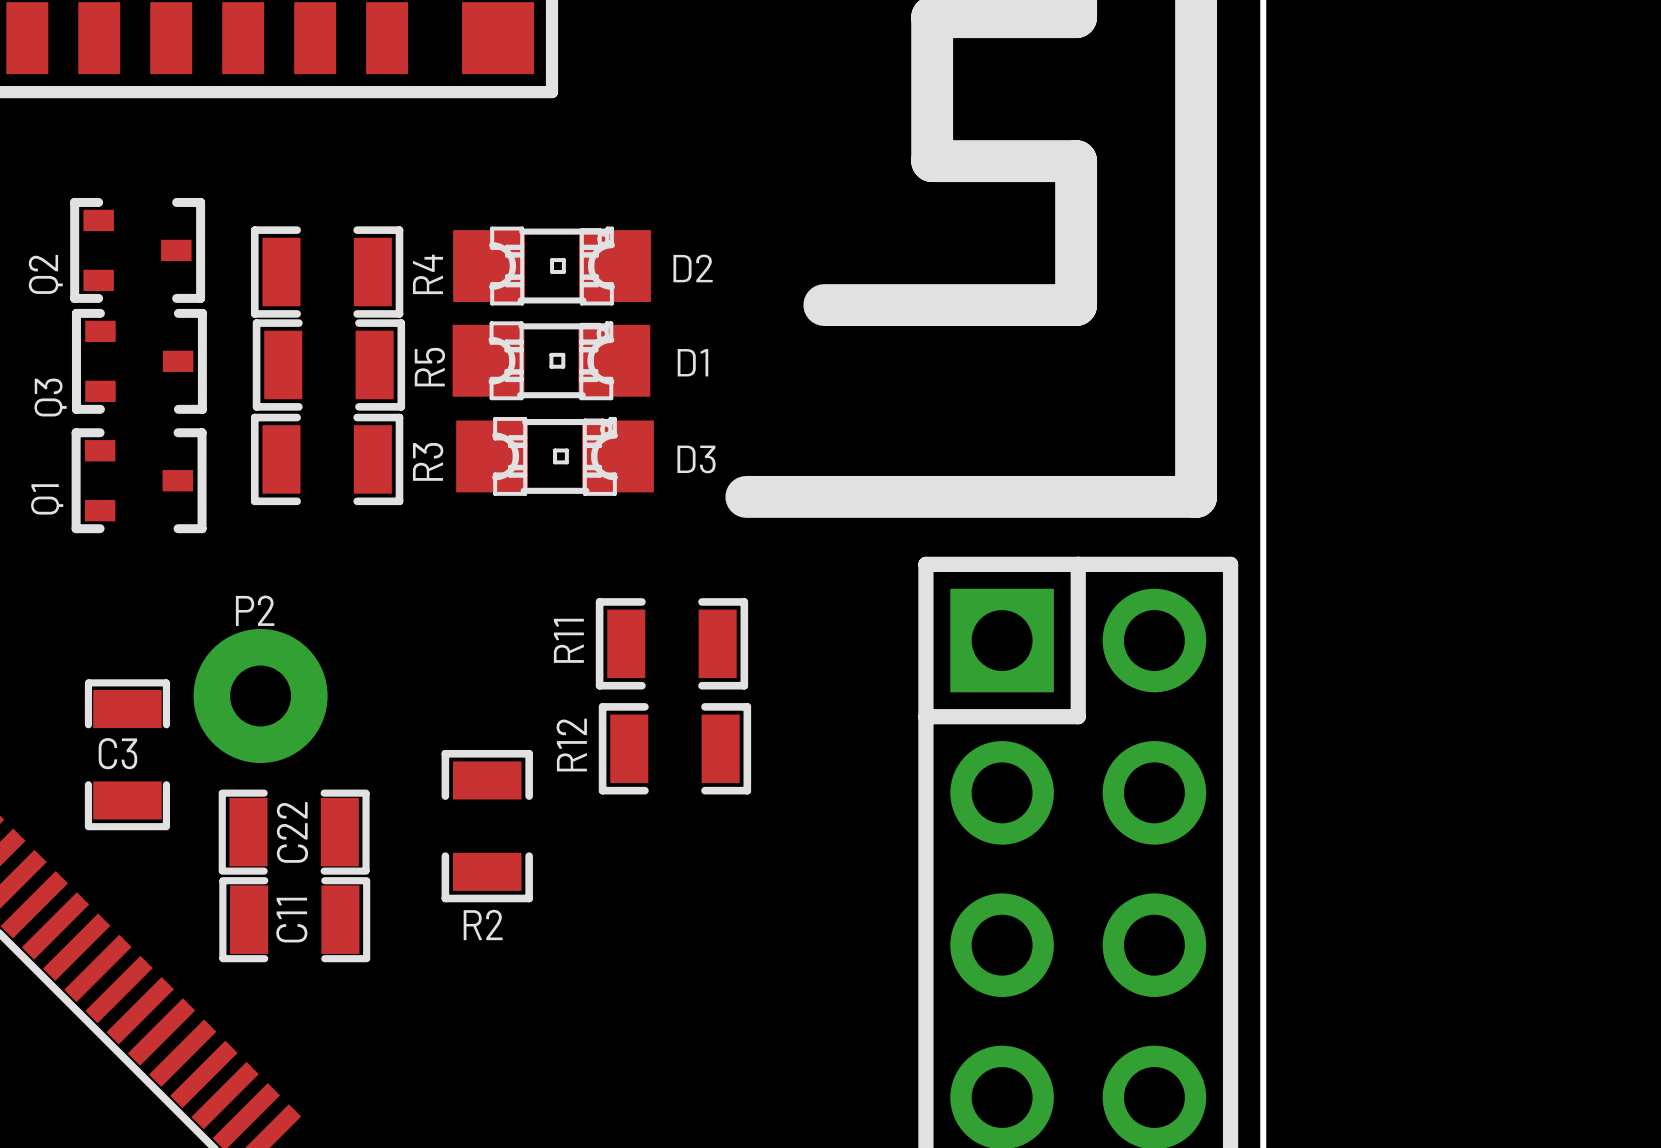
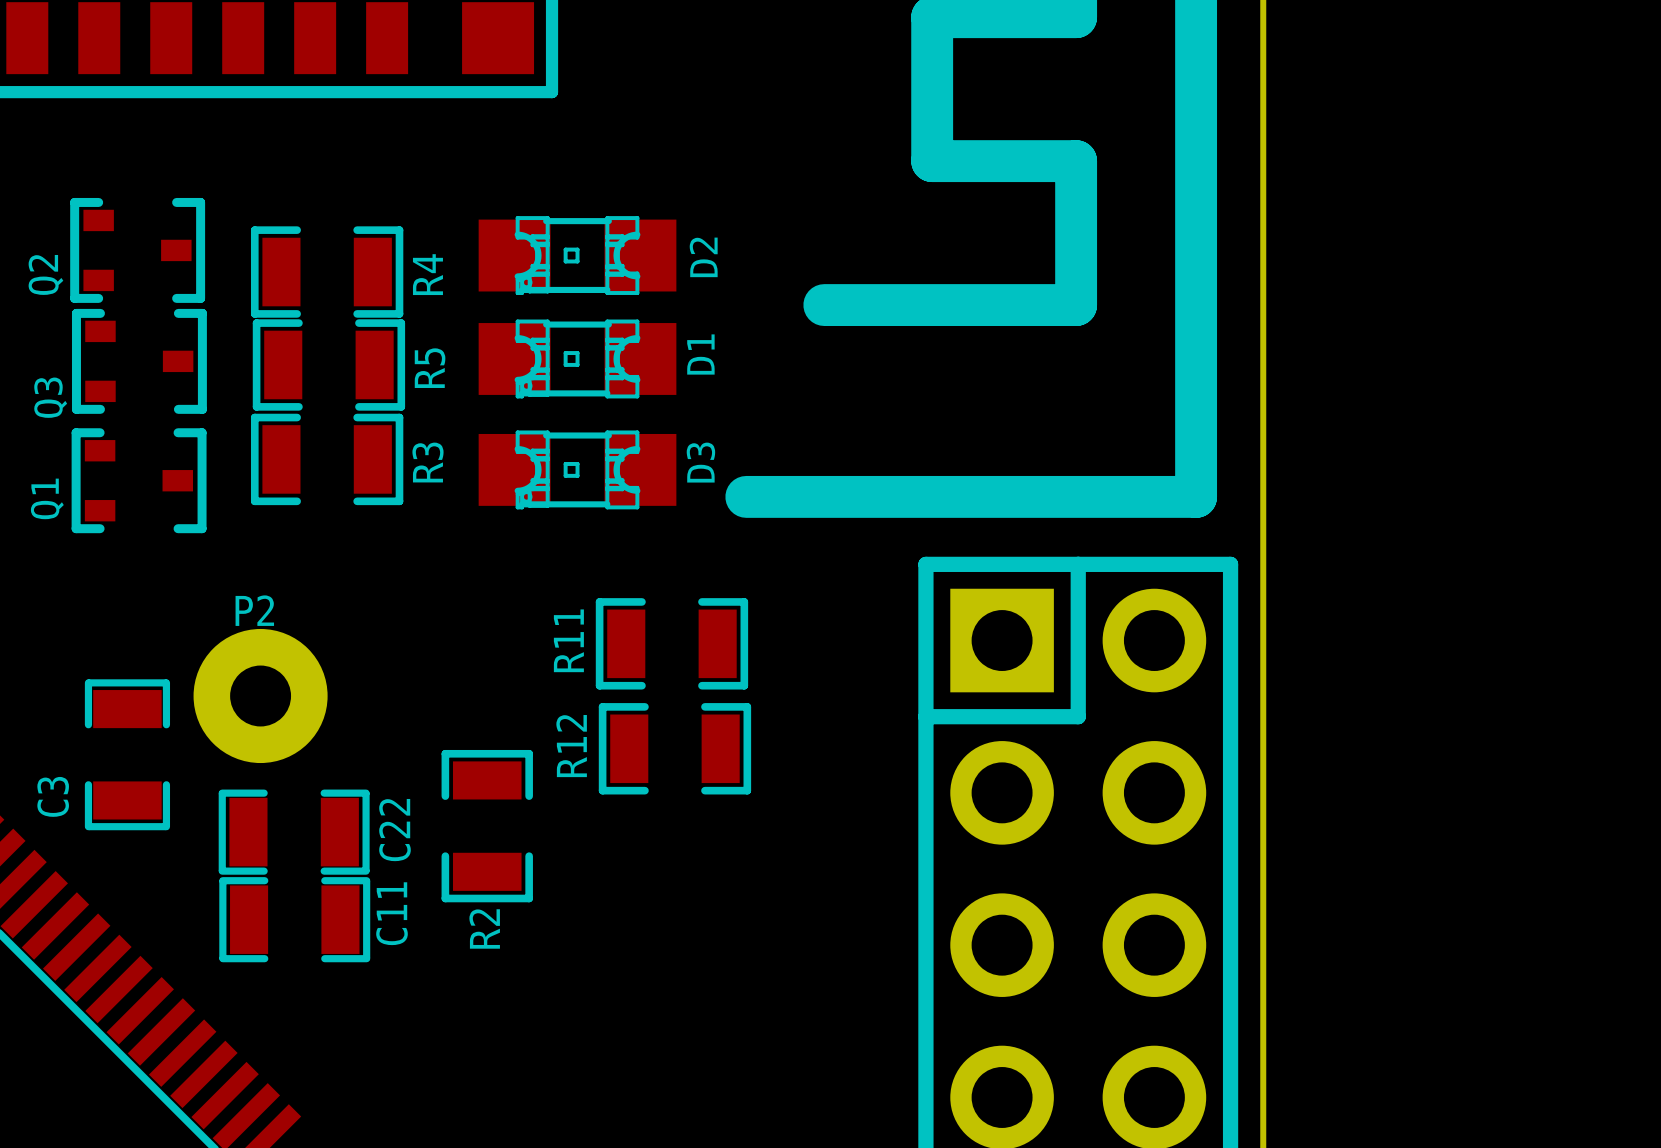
D2 rotation: 0° (552, 266) -> 180° (577, 255)
D1 rotation: 0° (551, 360) -> 180° (577, 358)
D3 rotation: 0° (555, 456) -> 180° (577, 469)
C3 name rotation: 0° (117, 753) -> 90° counterclockwise (53, 796)
C3 name position: C3 (117, 753) -> C3 (53, 796)
C22 name position: C22 (292, 832) -> C22 (394, 830)
C11 name position: C11 (291, 920) -> C11 (391, 913)
R2 name rotation: 0° (483, 924) -> 90° counterclockwise (484, 928)

